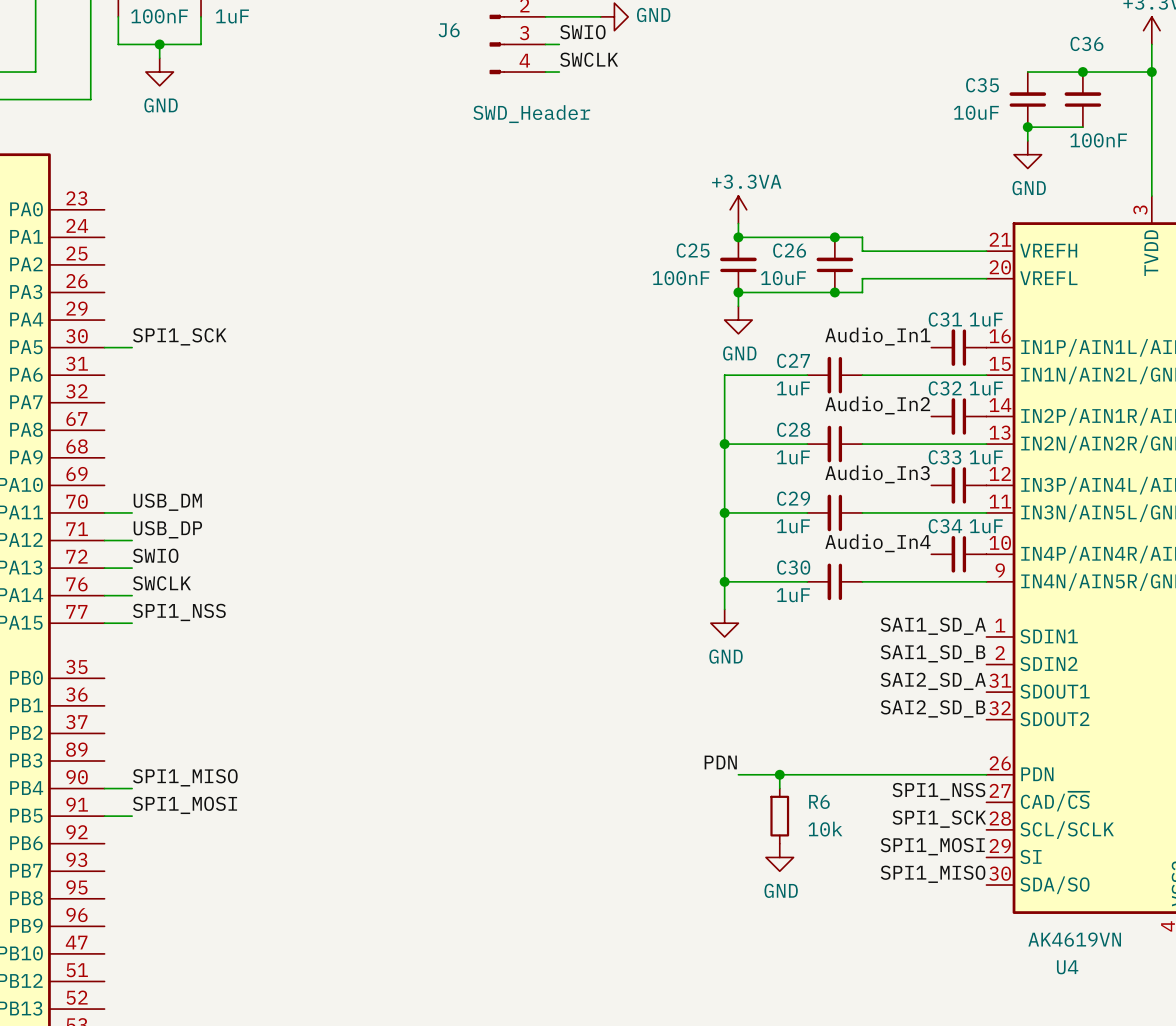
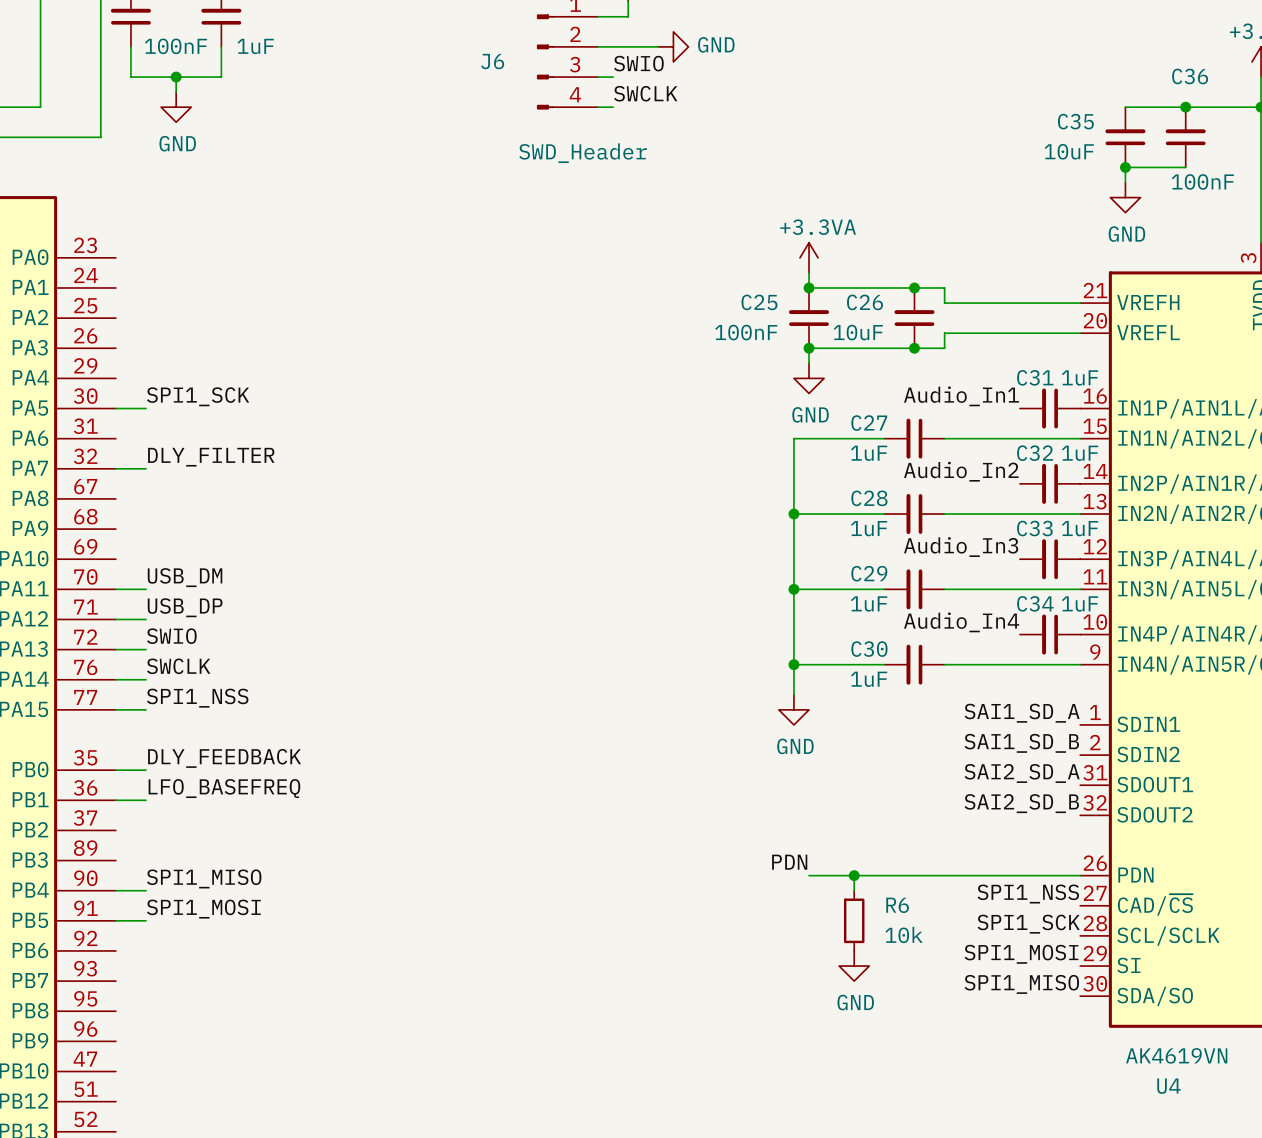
label: none -> DLY_FILTER (211, 457)
wire: none -> (115, 468) (146, 468)
label: none -> DLY_FEEDBACK (224, 758)
wire: none -> (115, 770) (146, 770)
label: none -> LFO_BASEFREQ (224, 788)
wire: none -> (115, 800) (146, 800)

